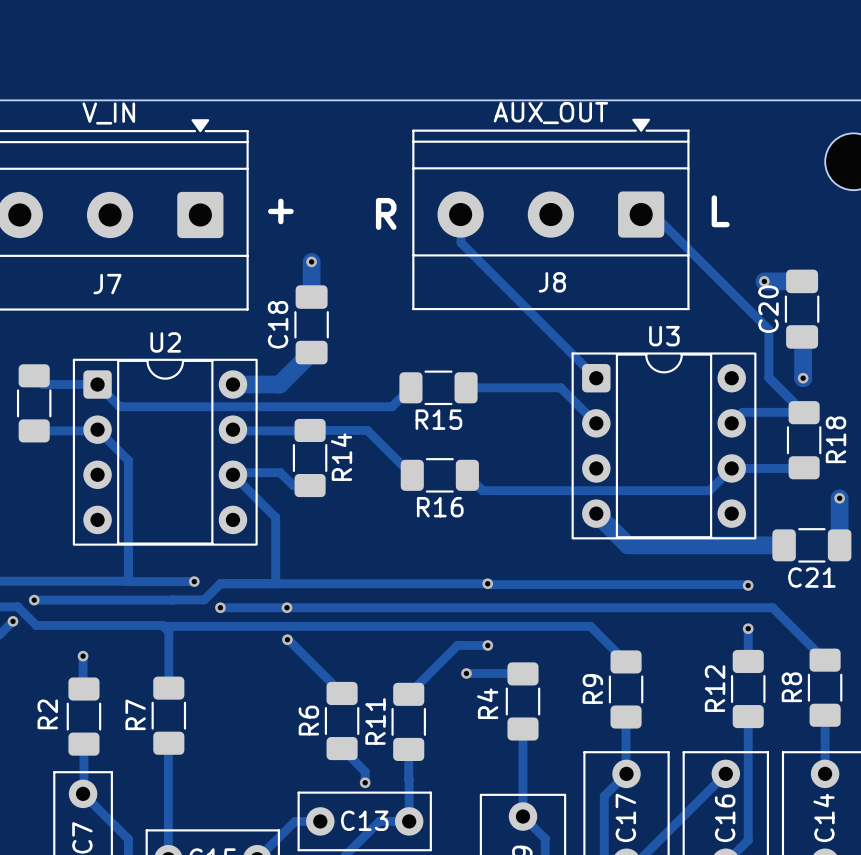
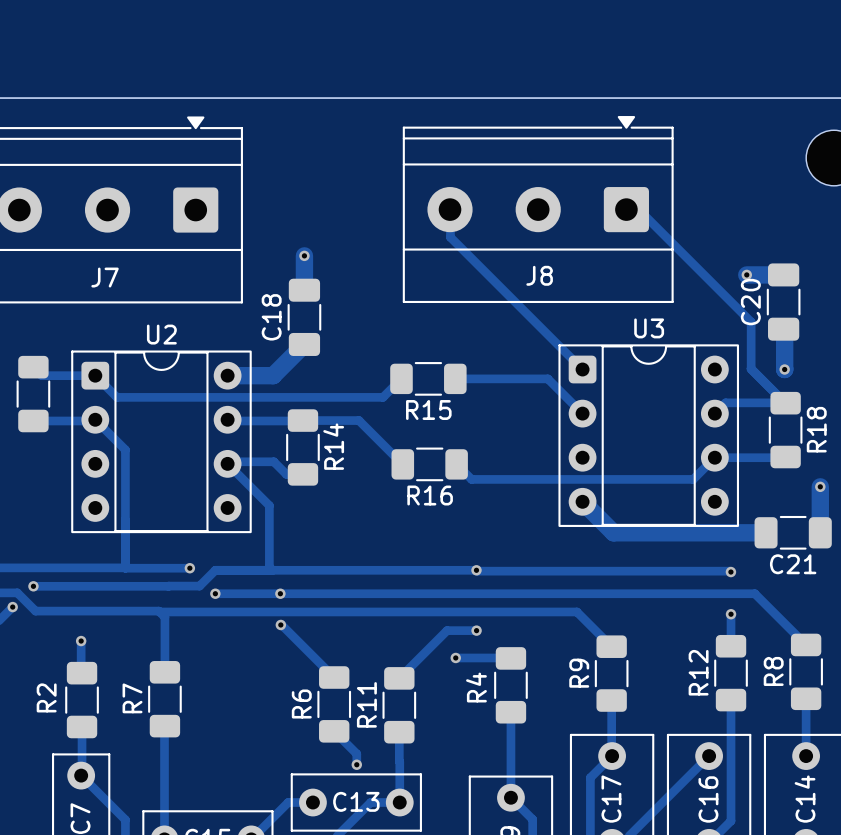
J7 value: V_IN (108, 113) -> none
J8 value: AUX_OUT (550, 113) -> none
text: + (280, 211) -> none
text: L (720, 211) -> none
text: R (386, 213) -> none

